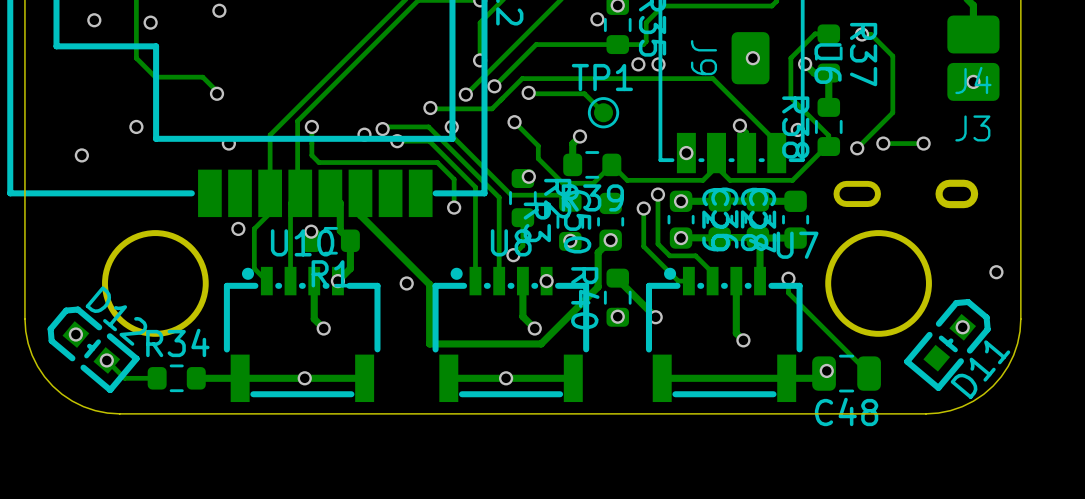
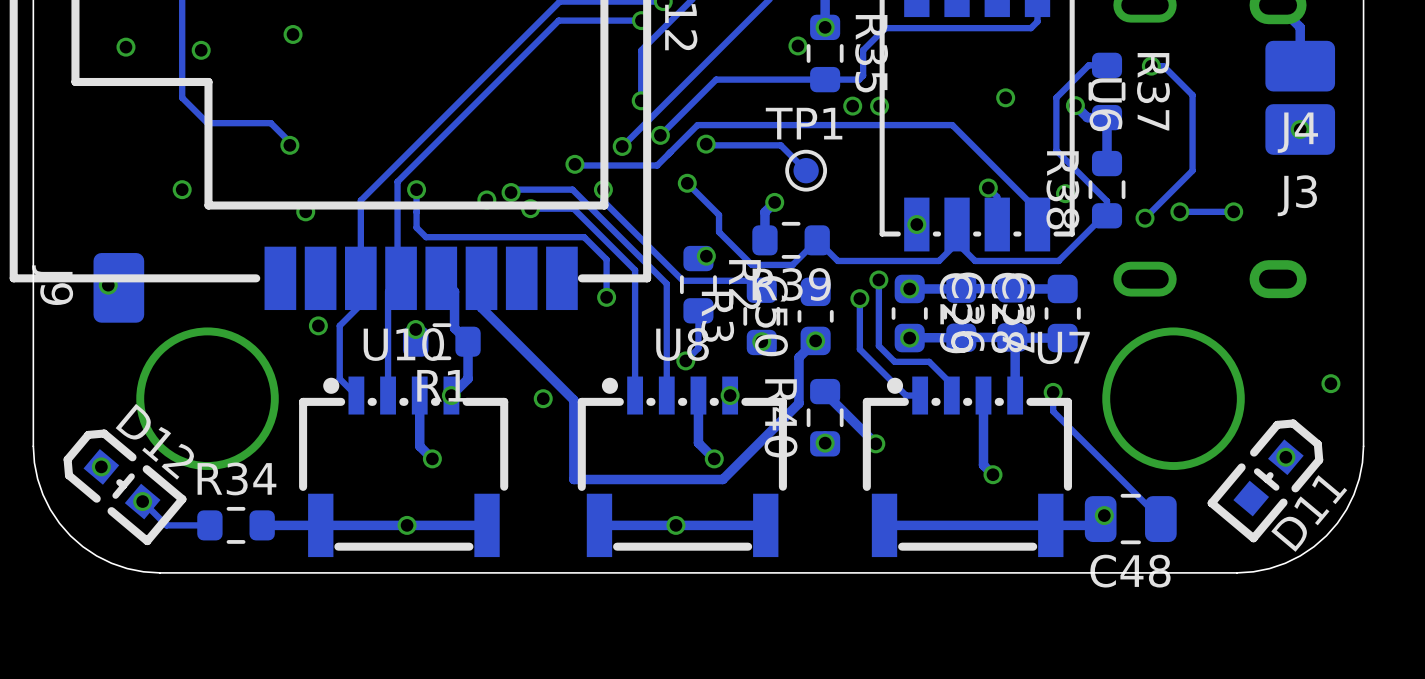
J9 position: (750, 58) -> (118, 287)
via position: (81, 155) -> (108, 285)

